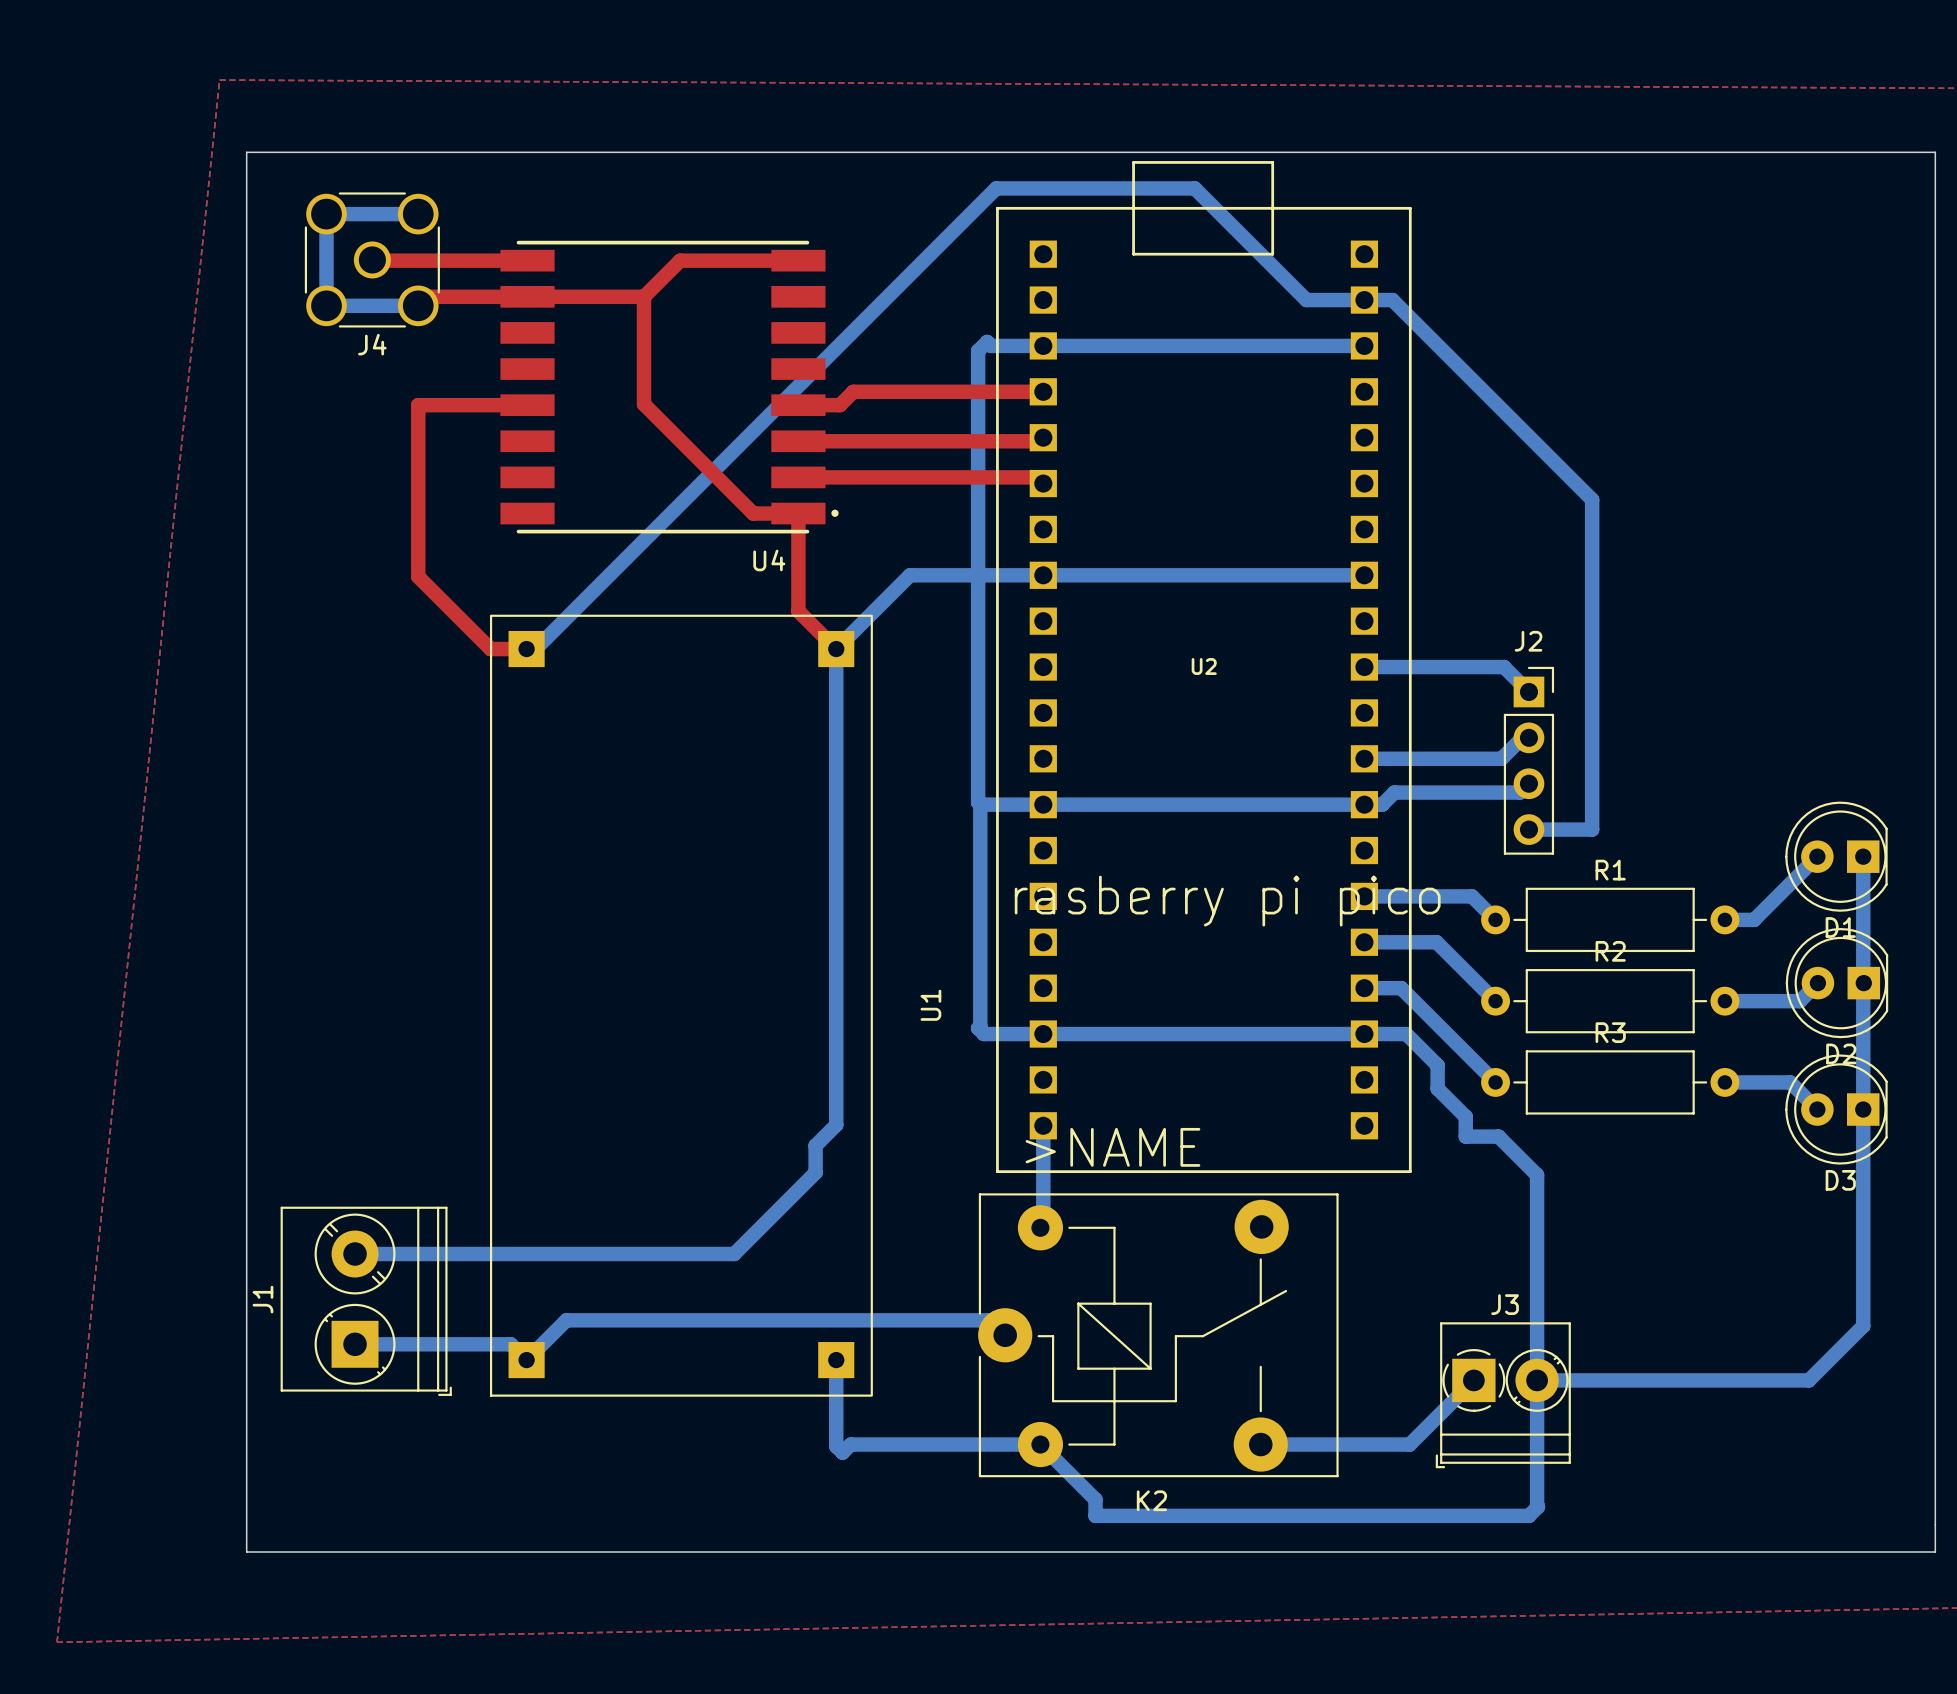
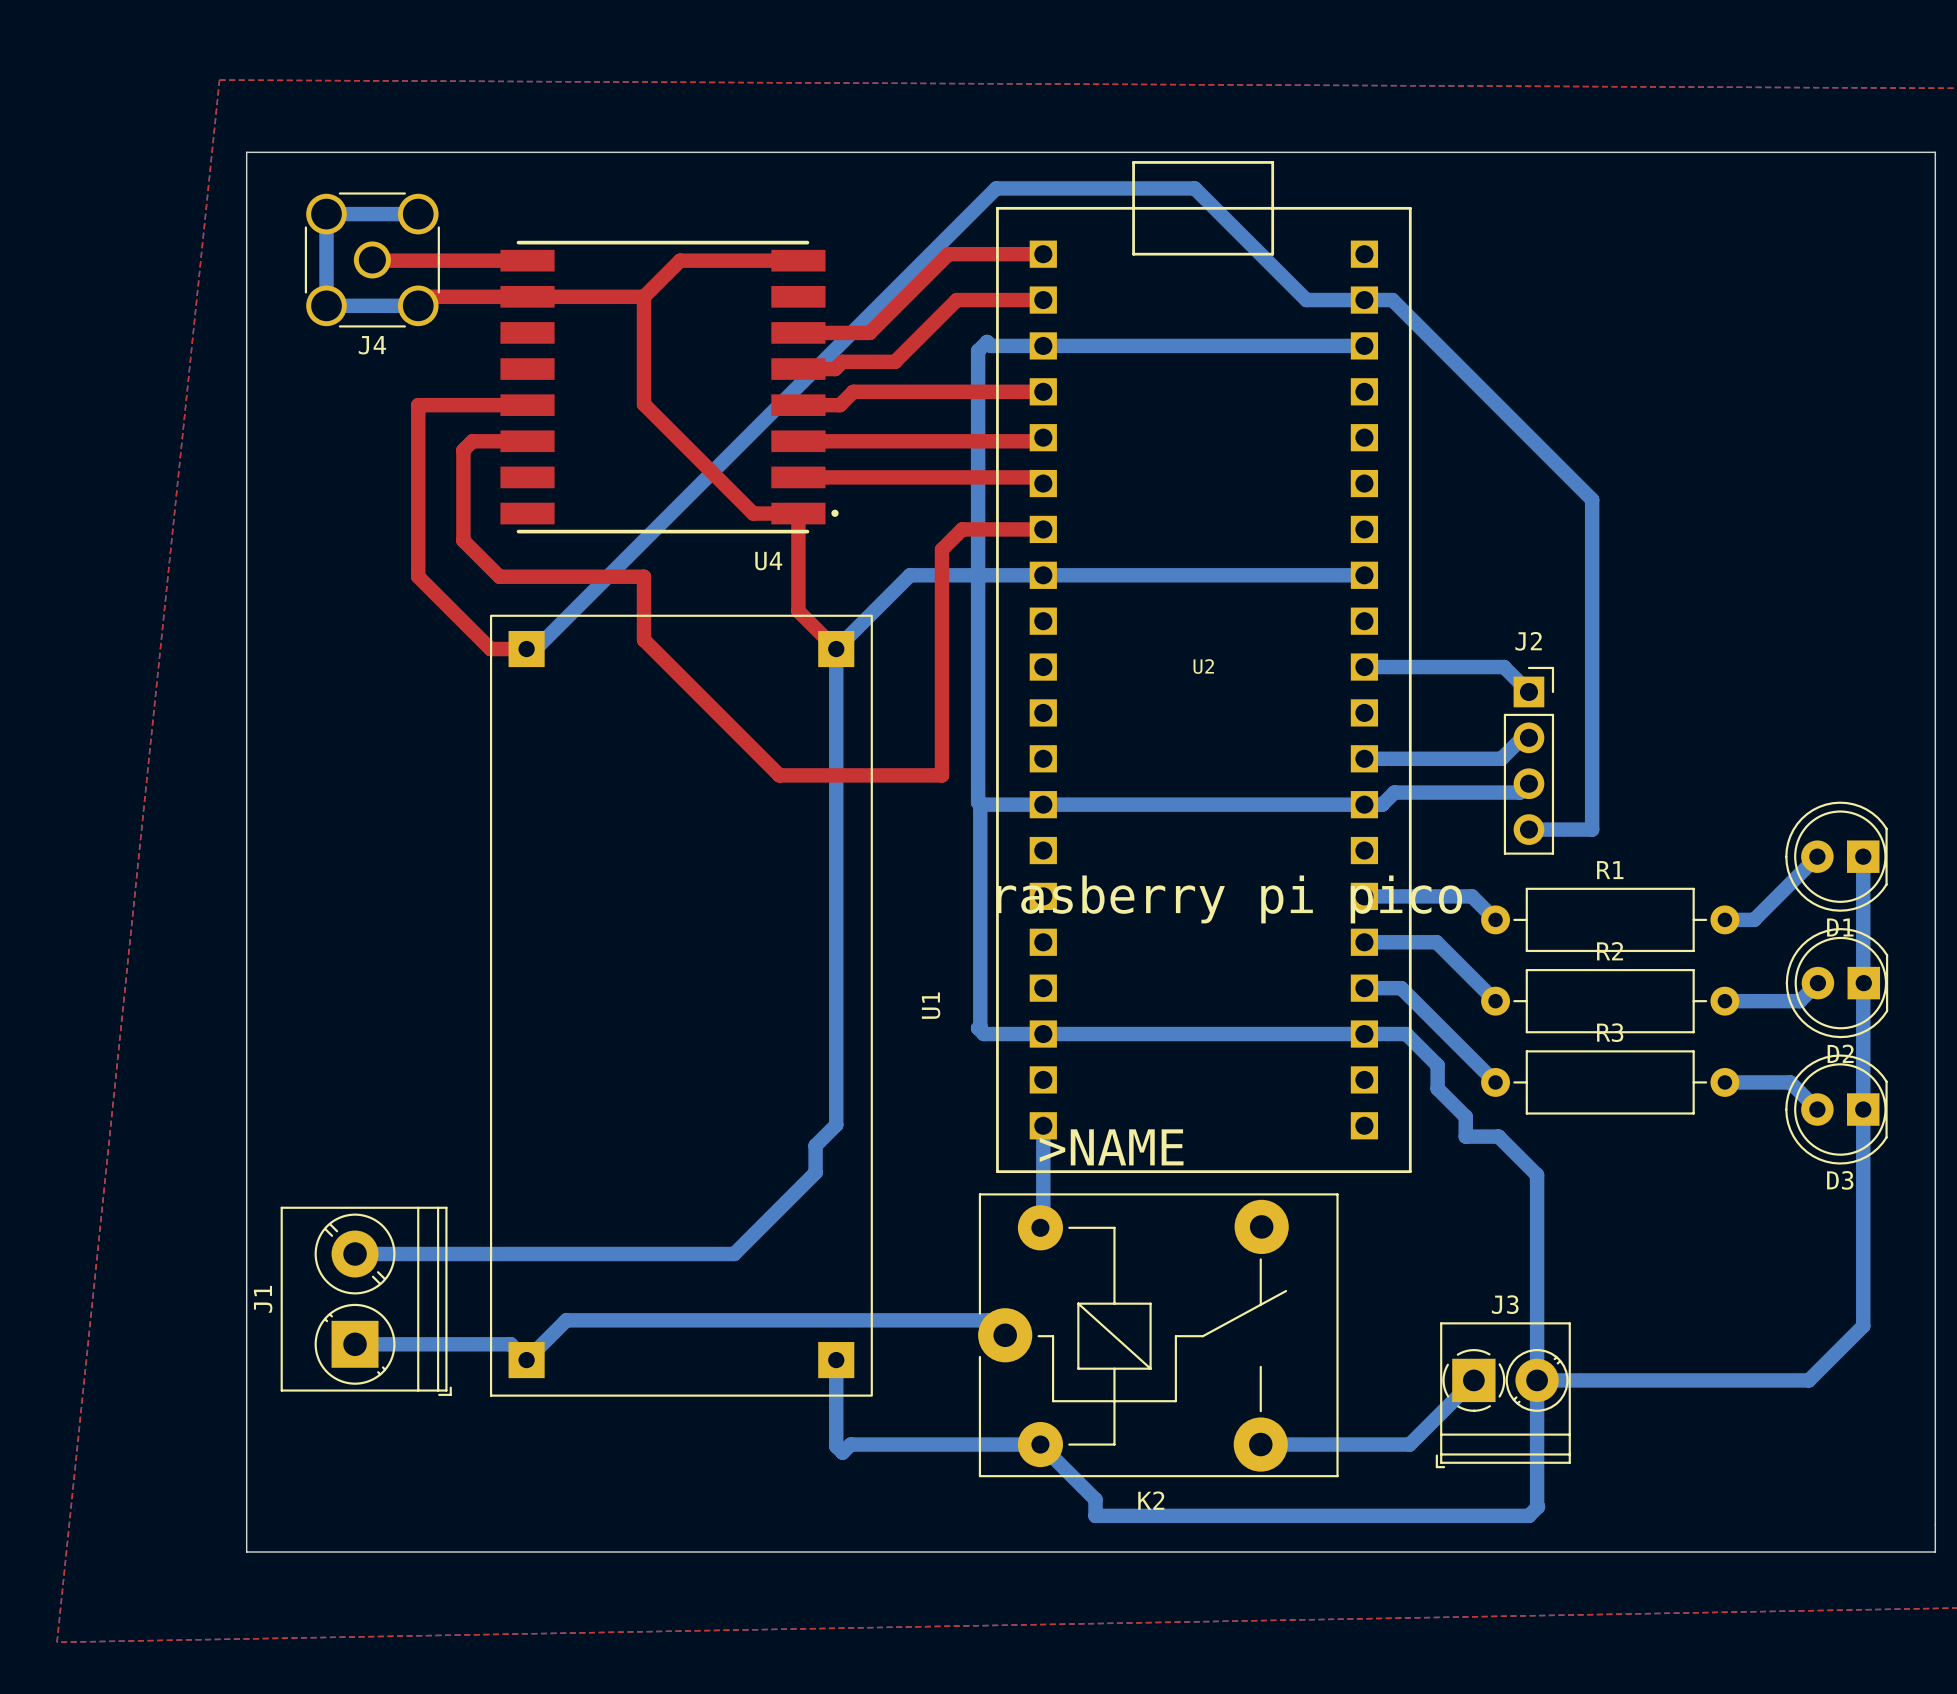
top track: none -> (1043, 254) (948, 254) (869, 332) (798, 332)
top track: none -> (1043, 300) (956, 300) (895, 361) (842, 361) (835, 369) (798, 369)
top track: none -> (527, 441) (472, 441) (463, 450) (463, 540) (499, 576) (644, 576) (644, 639) (779, 775) (942, 775) (942, 549) (962, 529) (1043, 529)

